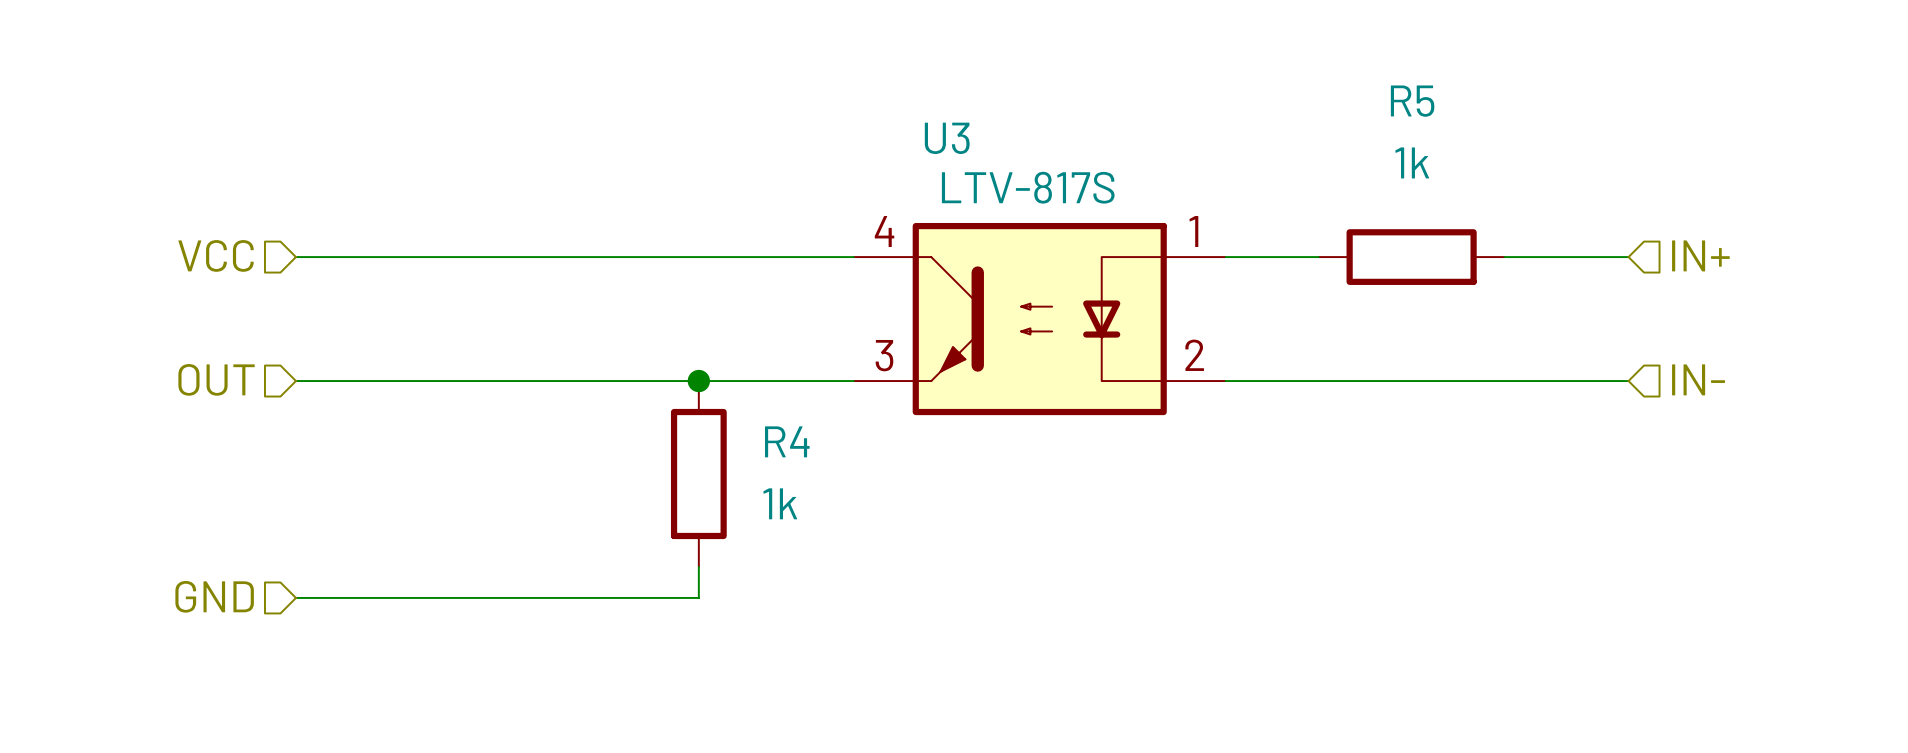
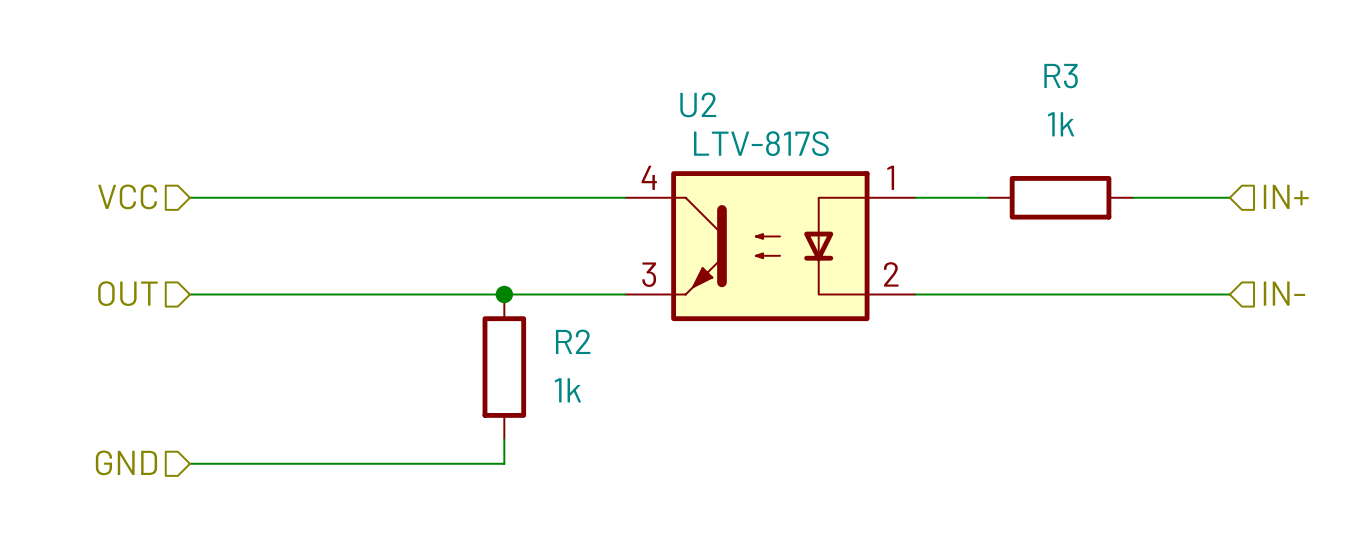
R5 name: R5 (1412, 101) -> R3 (1061, 76)
U3: LTV-817S (1039, 319) -> none
U2: none -> LTV-817S (770, 246)
R4 name: R4 (787, 441) -> R2 (573, 341)

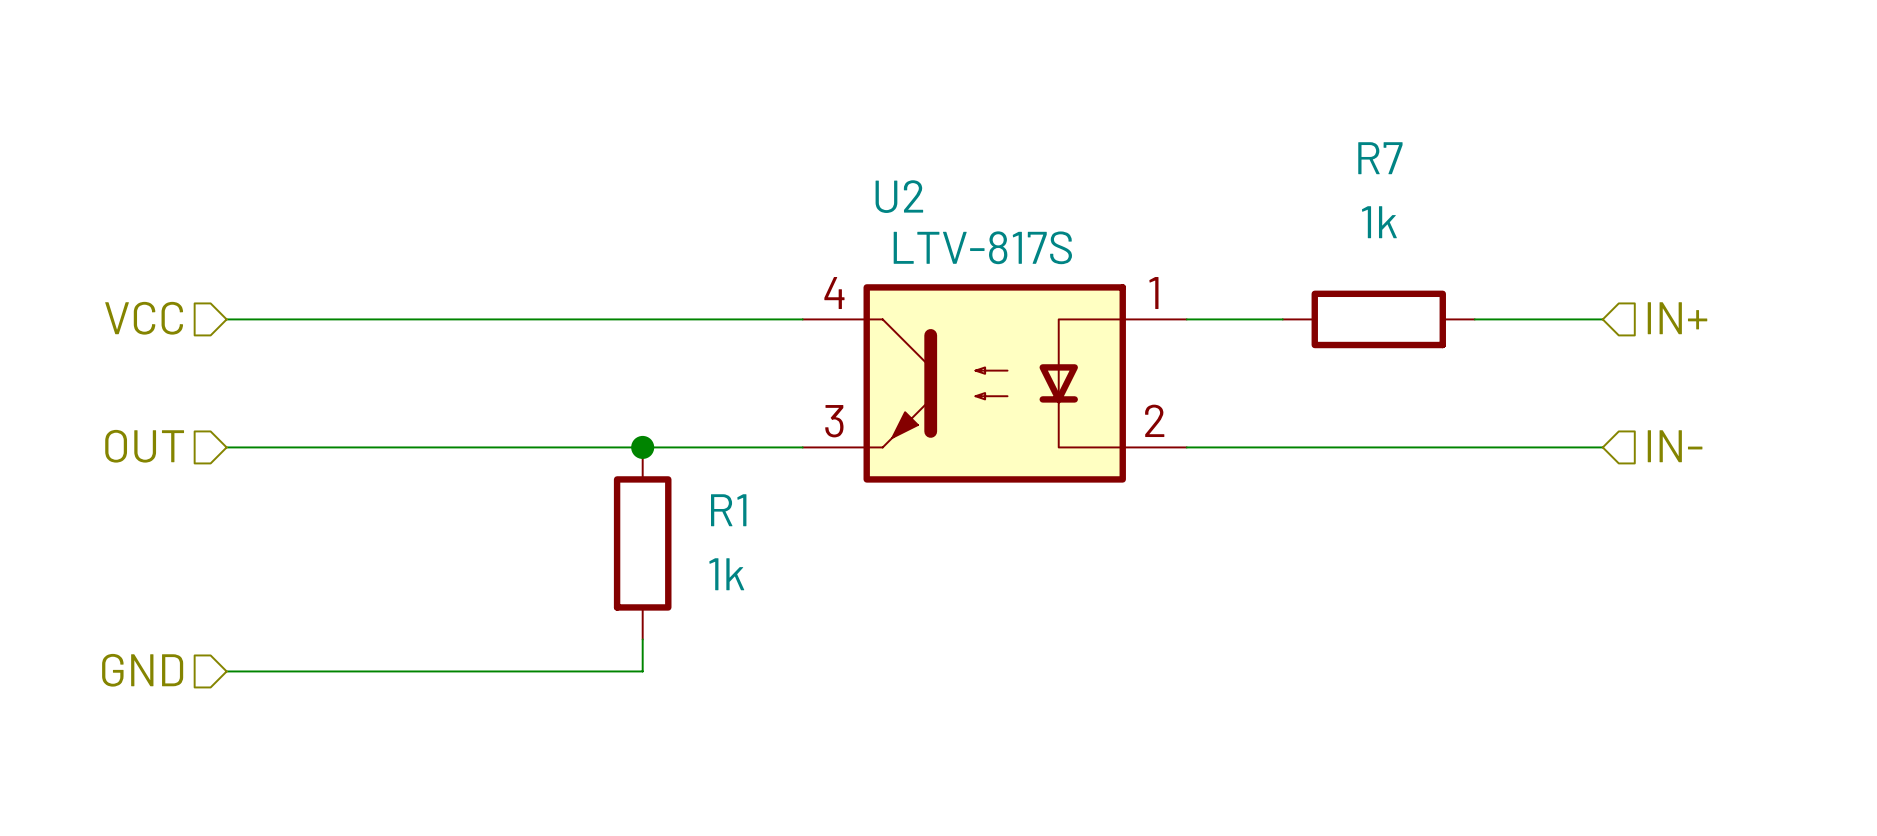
R3 name: R3 (1061, 76) -> R7 (1380, 158)
R2 name: R2 (573, 341) -> R1 (728, 510)

